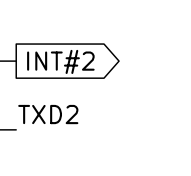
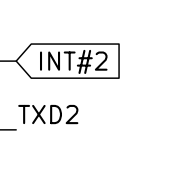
global label shape: output (60, 61) -> input (73, 61)

